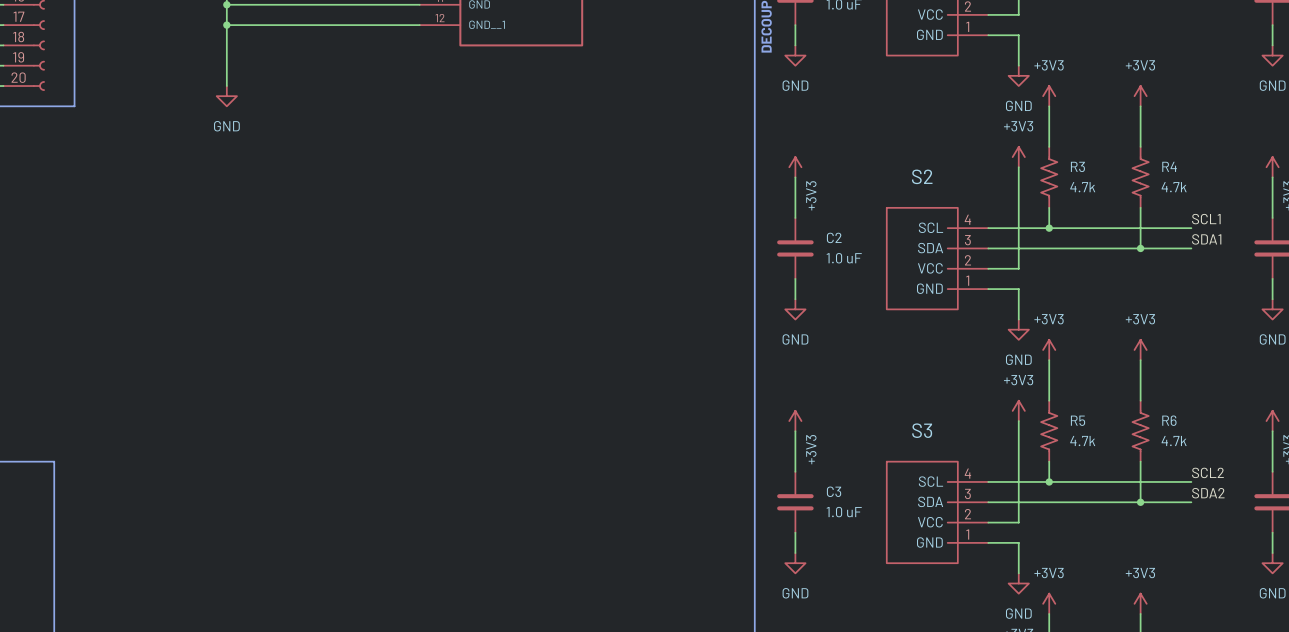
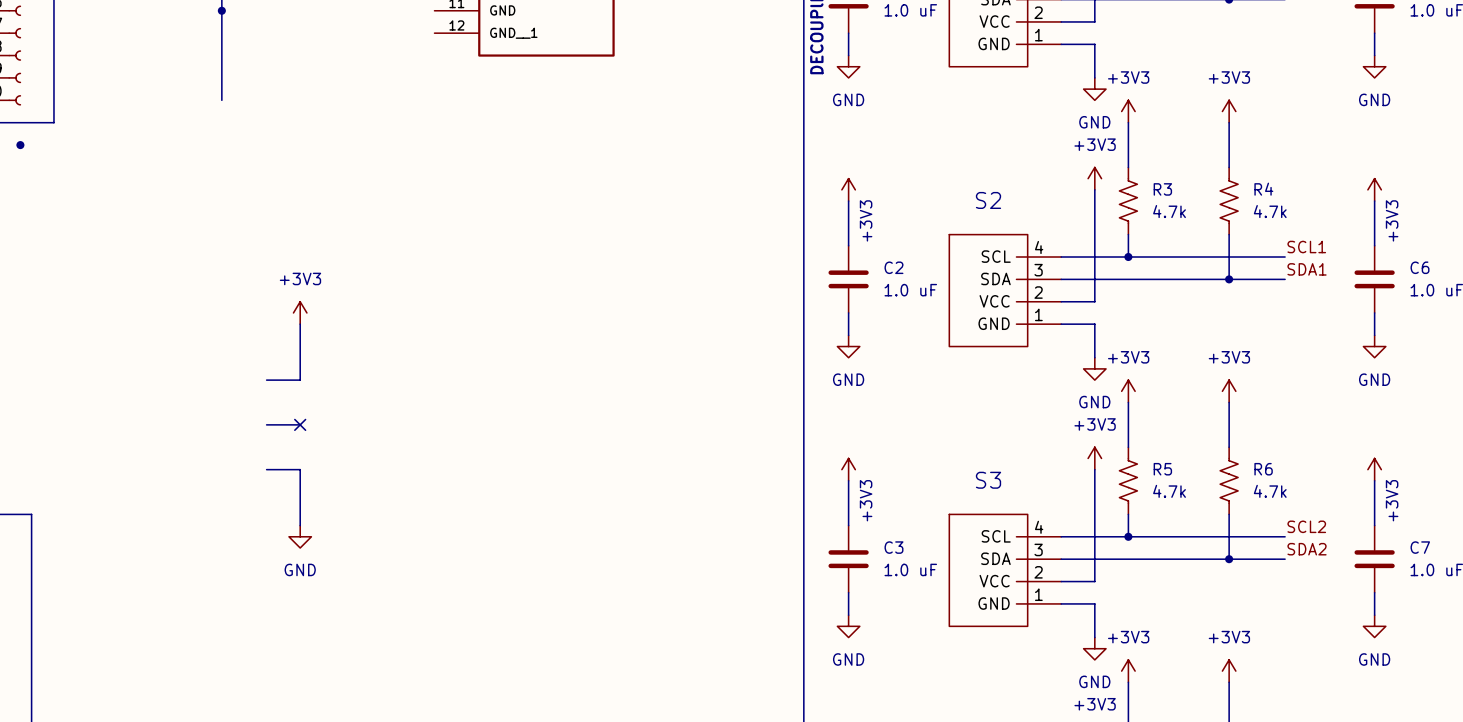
wire: (226, 4) (419, 4) -> none
wire: (226, 25) (419, 25) -> none
junction: (226, 25) -> none
power symbol: GND (226, 96) -> none
junction: none -> (20, 145)
power symbol: none -> +3V3 (300, 312)
wire: none -> (300, 324) (300, 380) (266, 380)
wire: none -> (266, 424) (300, 424)
no-connect mark: none -> (300, 424)
wire: none -> (266, 469) (300, 469) (300, 525)
power symbol: none -> GND (300, 536)

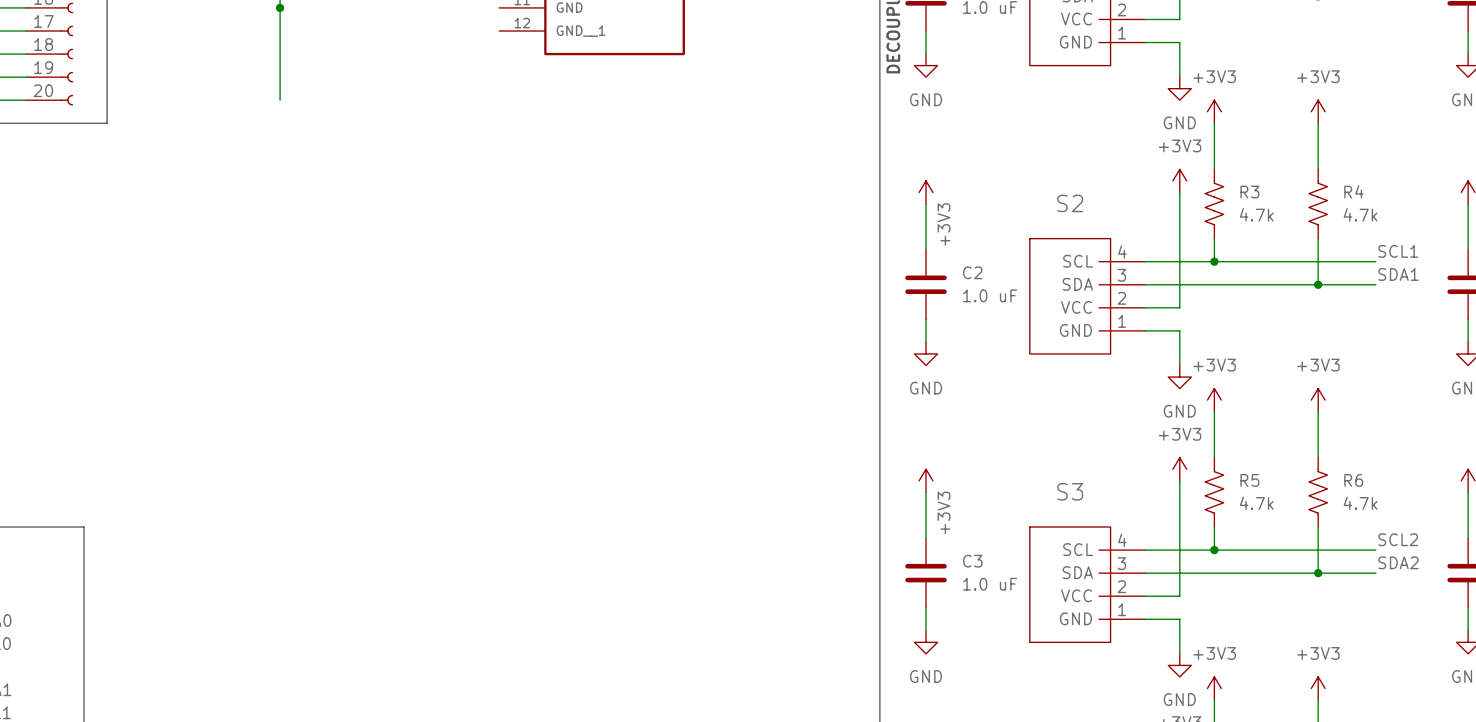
junction: (20, 145) -> none
power symbol: +3V3 (300, 312) -> none
wire: (300, 324) (300, 380) (266, 380) -> none
wire: (266, 424) (300, 424) -> none
no-connect mark: (300, 424) -> none
wire: (266, 469) (300, 469) (300, 525) -> none
power symbol: GND (300, 536) -> none

